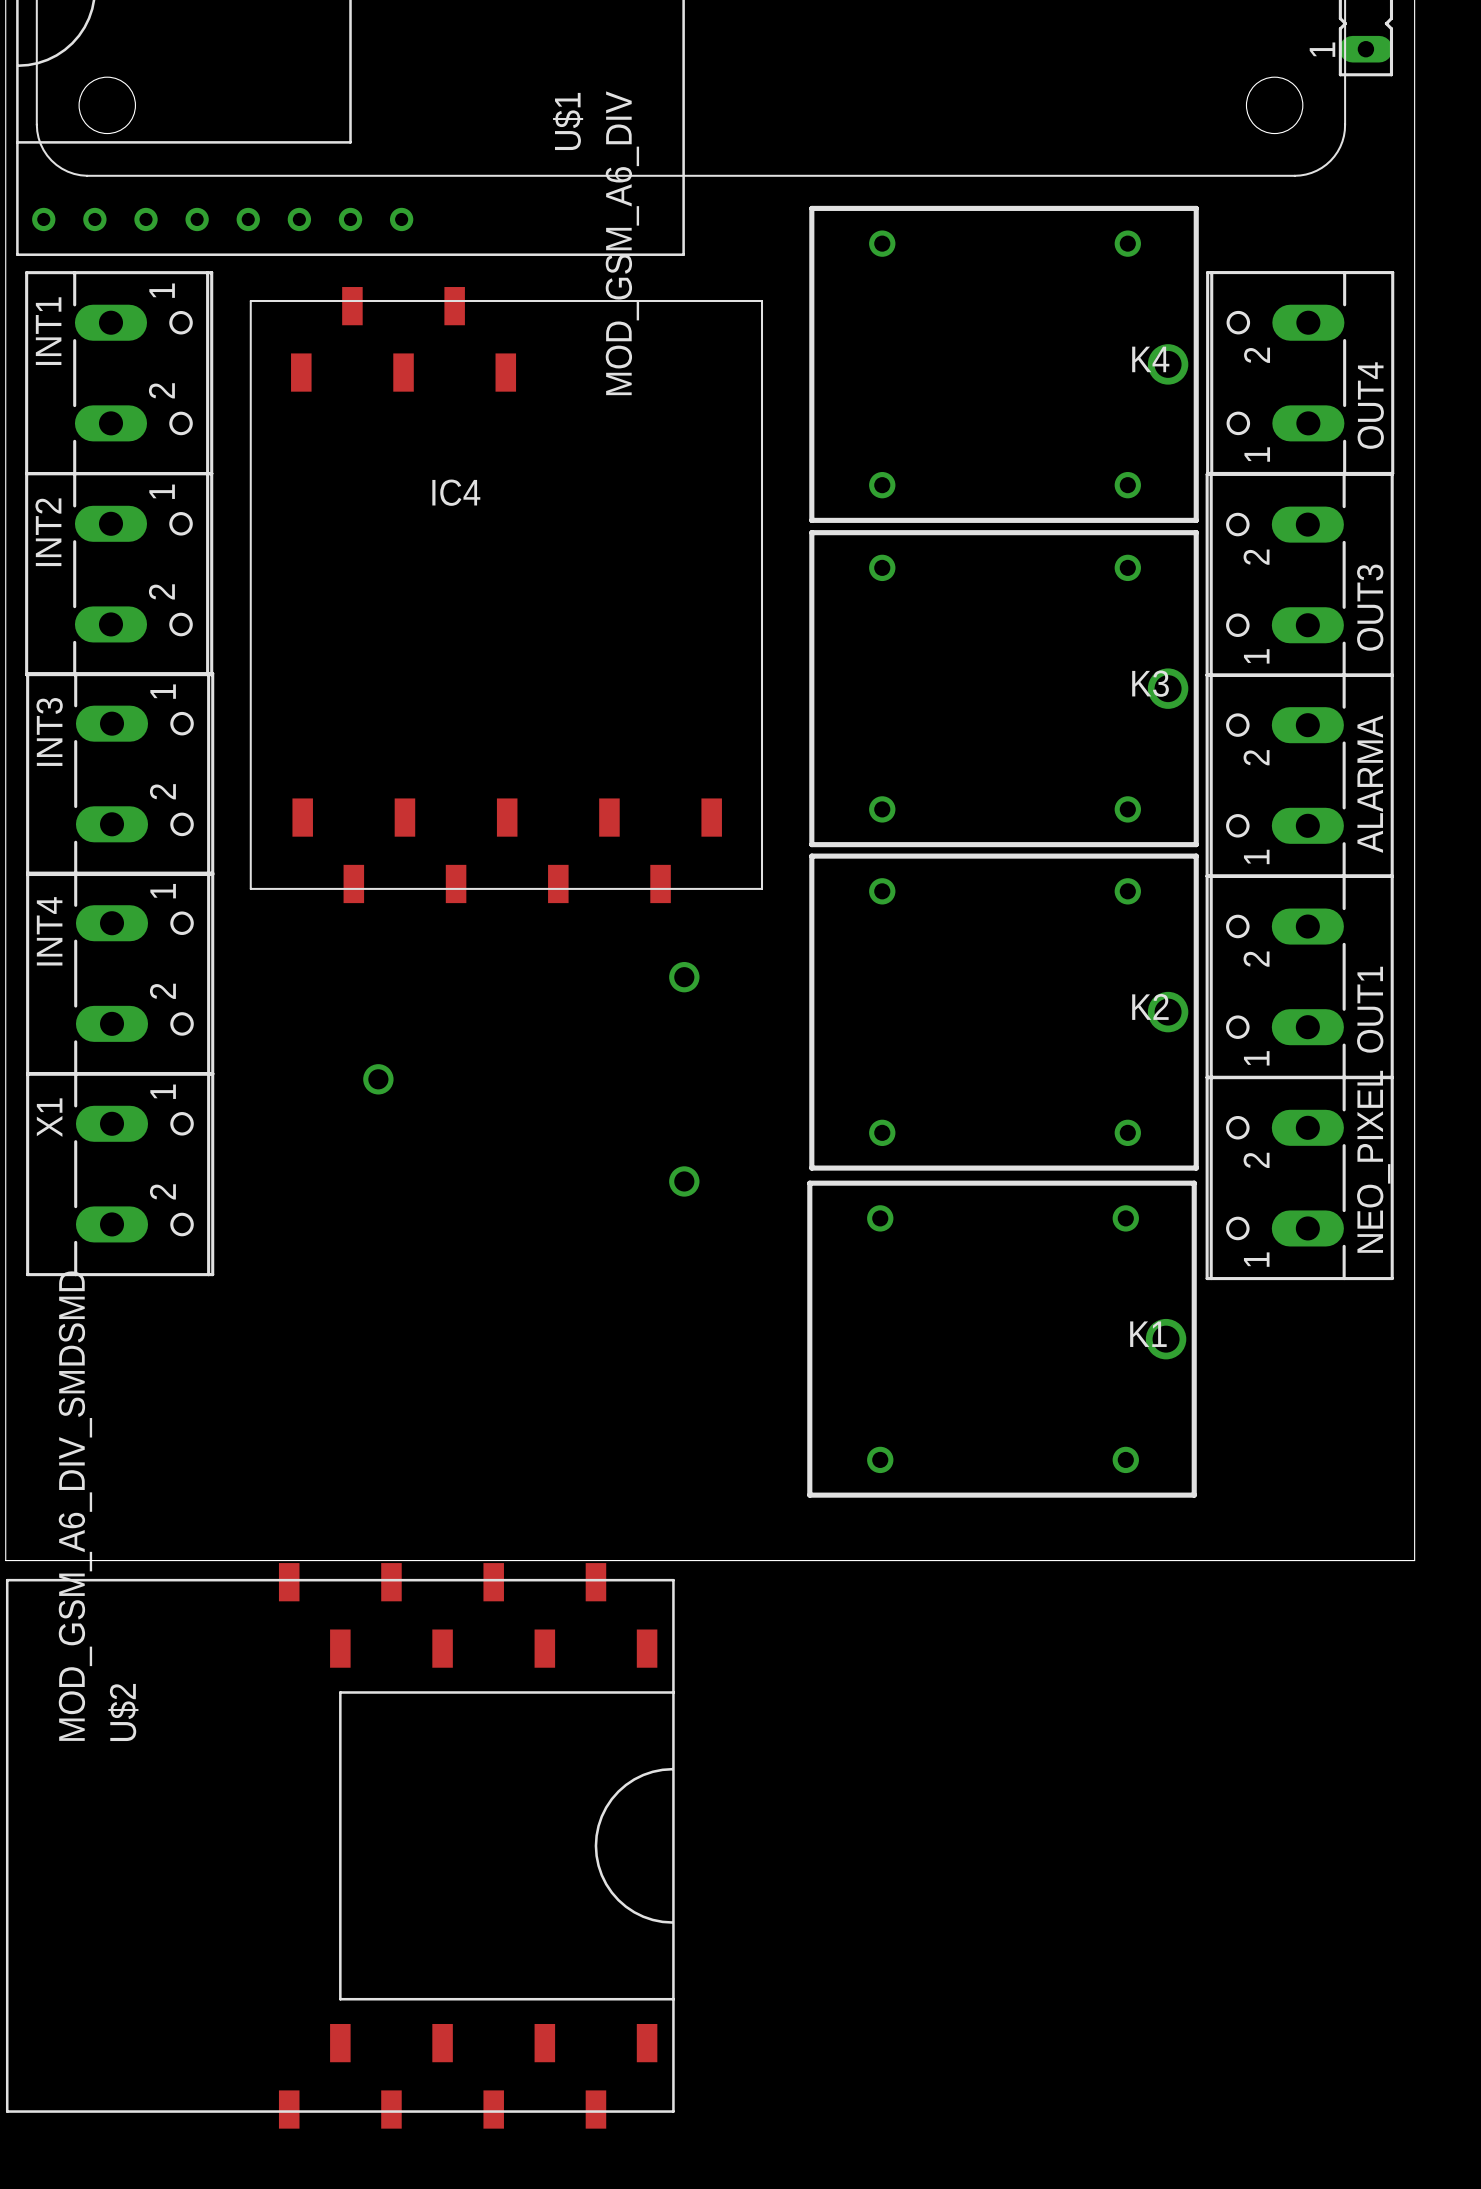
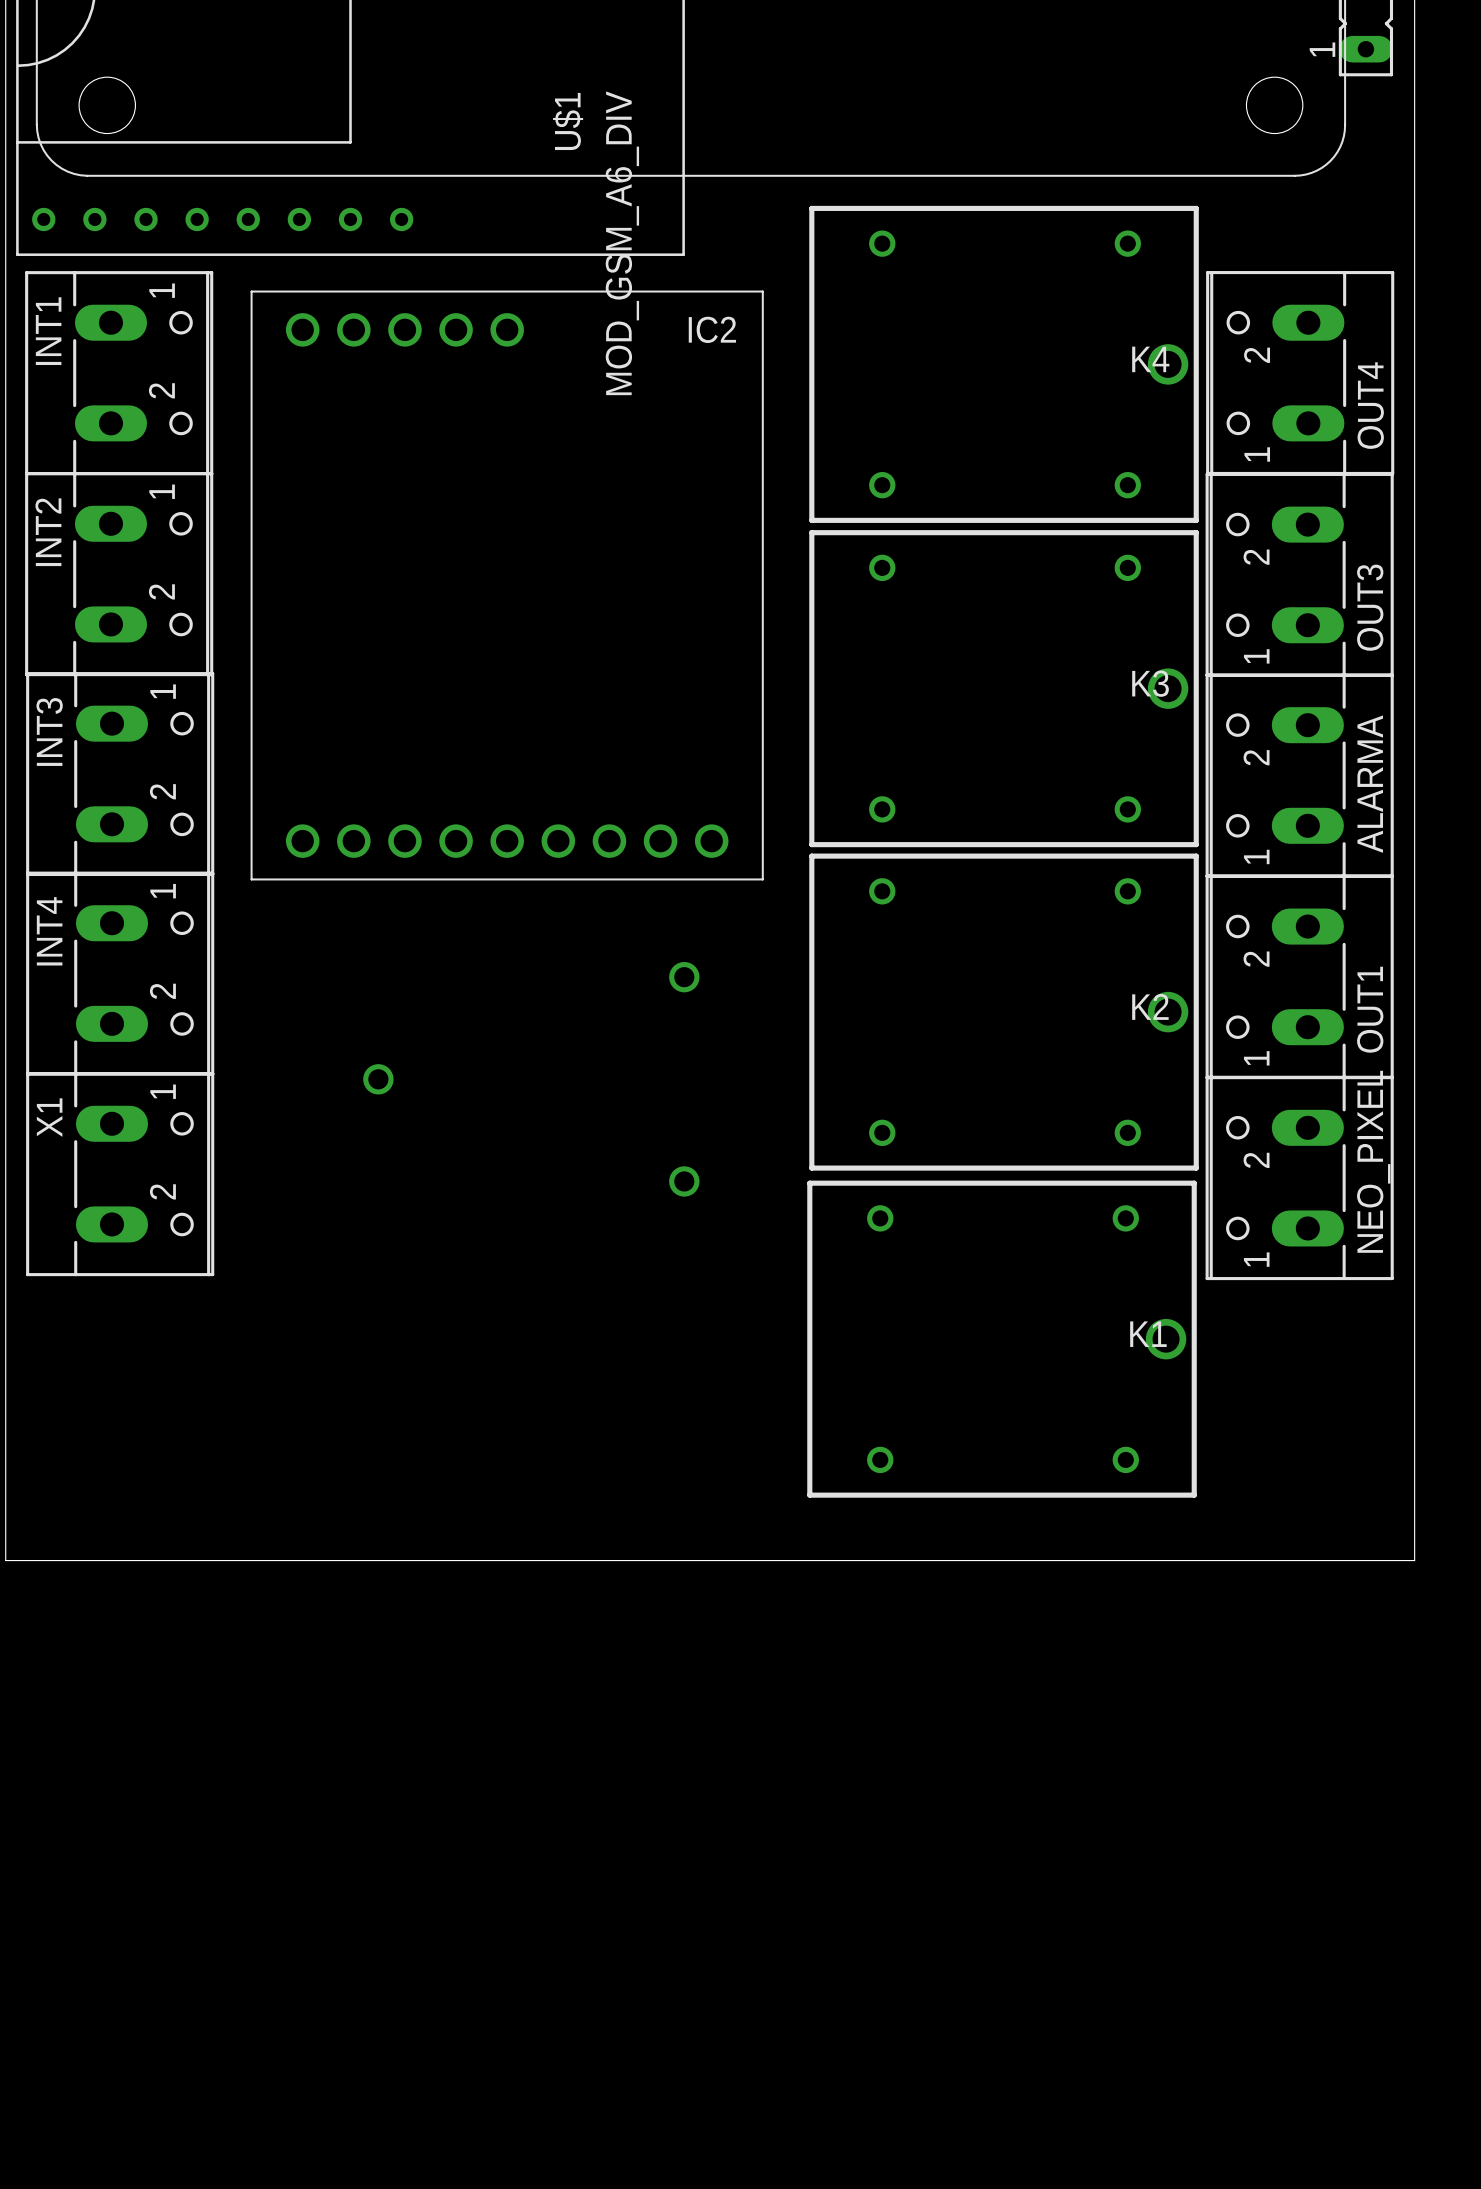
IC2: none -> (507, 585)
IC4: (506, 595) -> none
U$2: MOD_GSM_A6_DIV_SMDSMD (340, 1845) -> none

